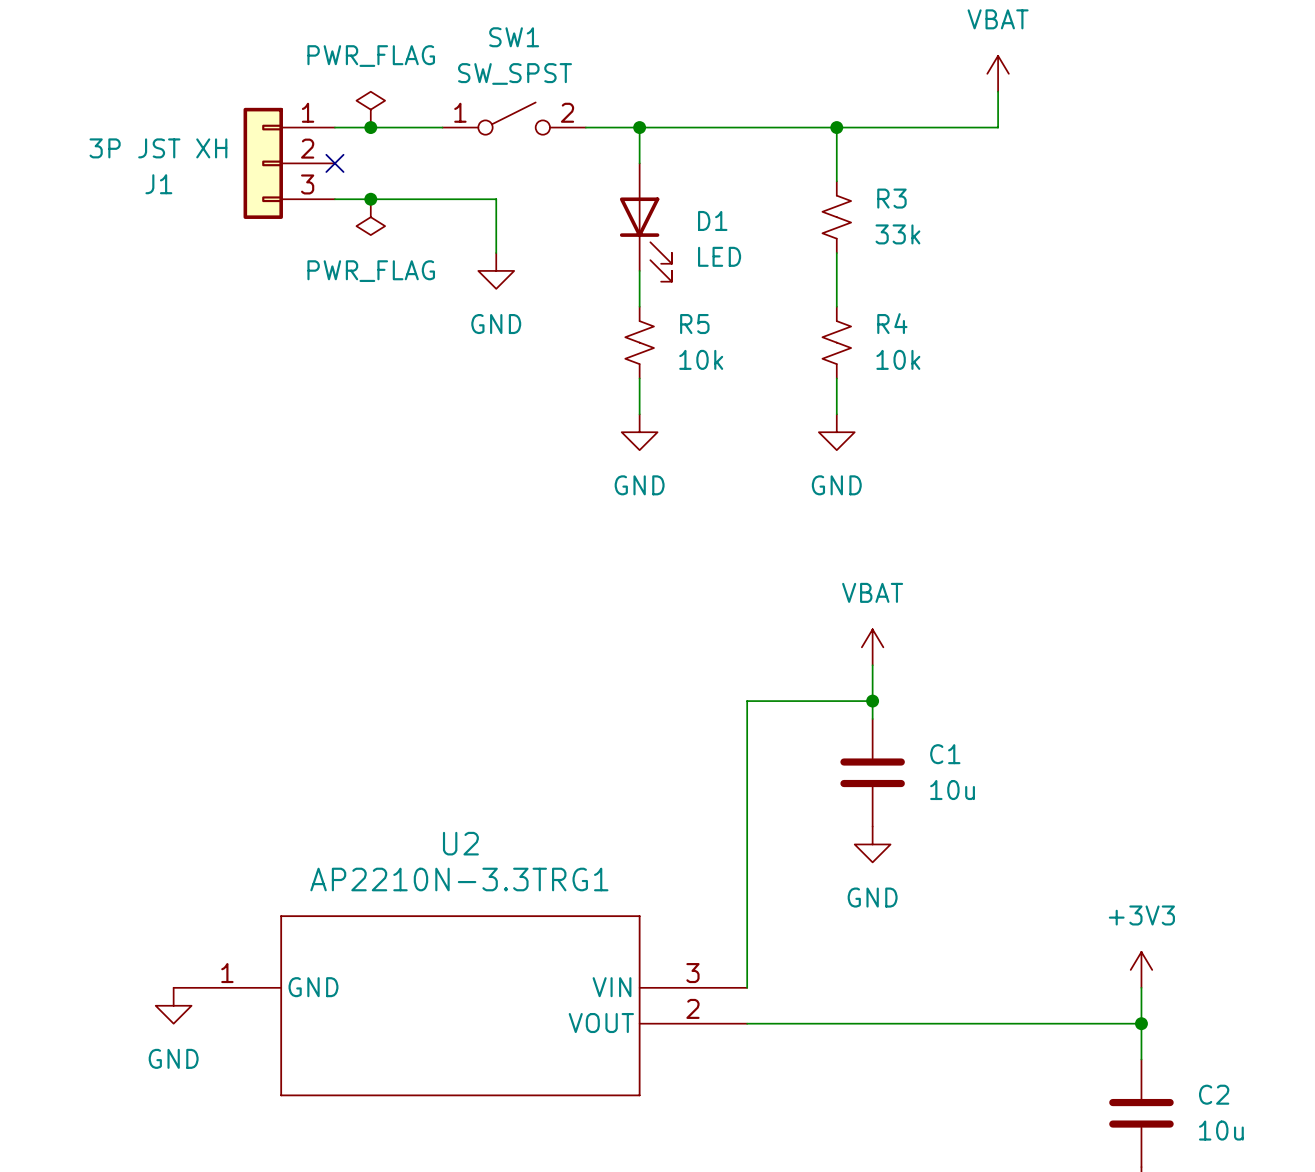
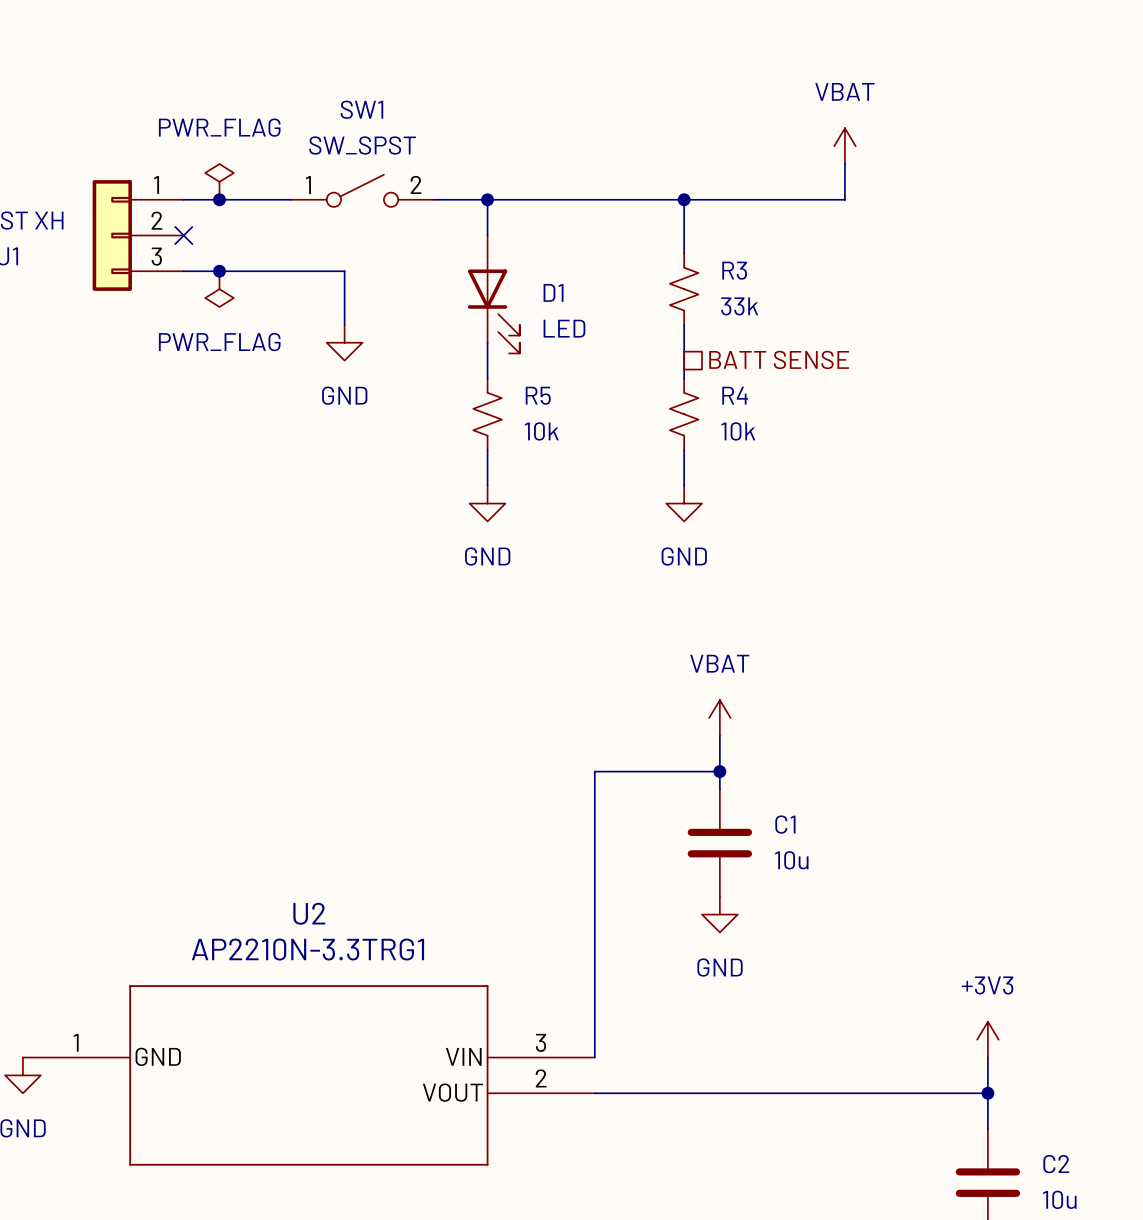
hierarchical label: none -> BATT SENSE (779, 359)

